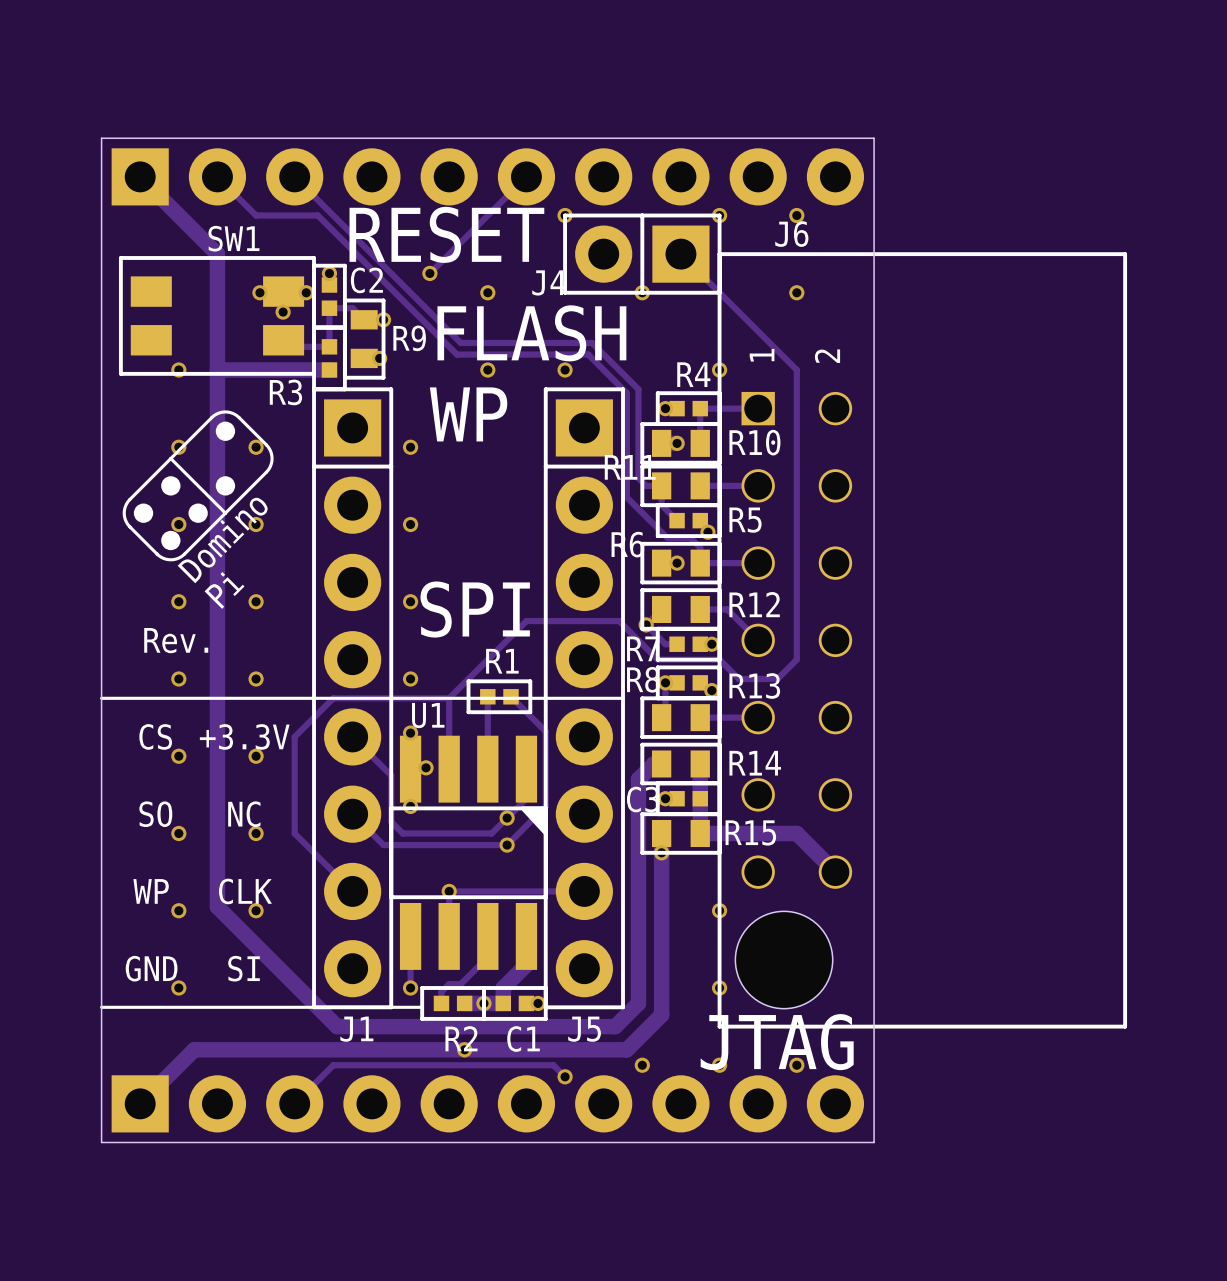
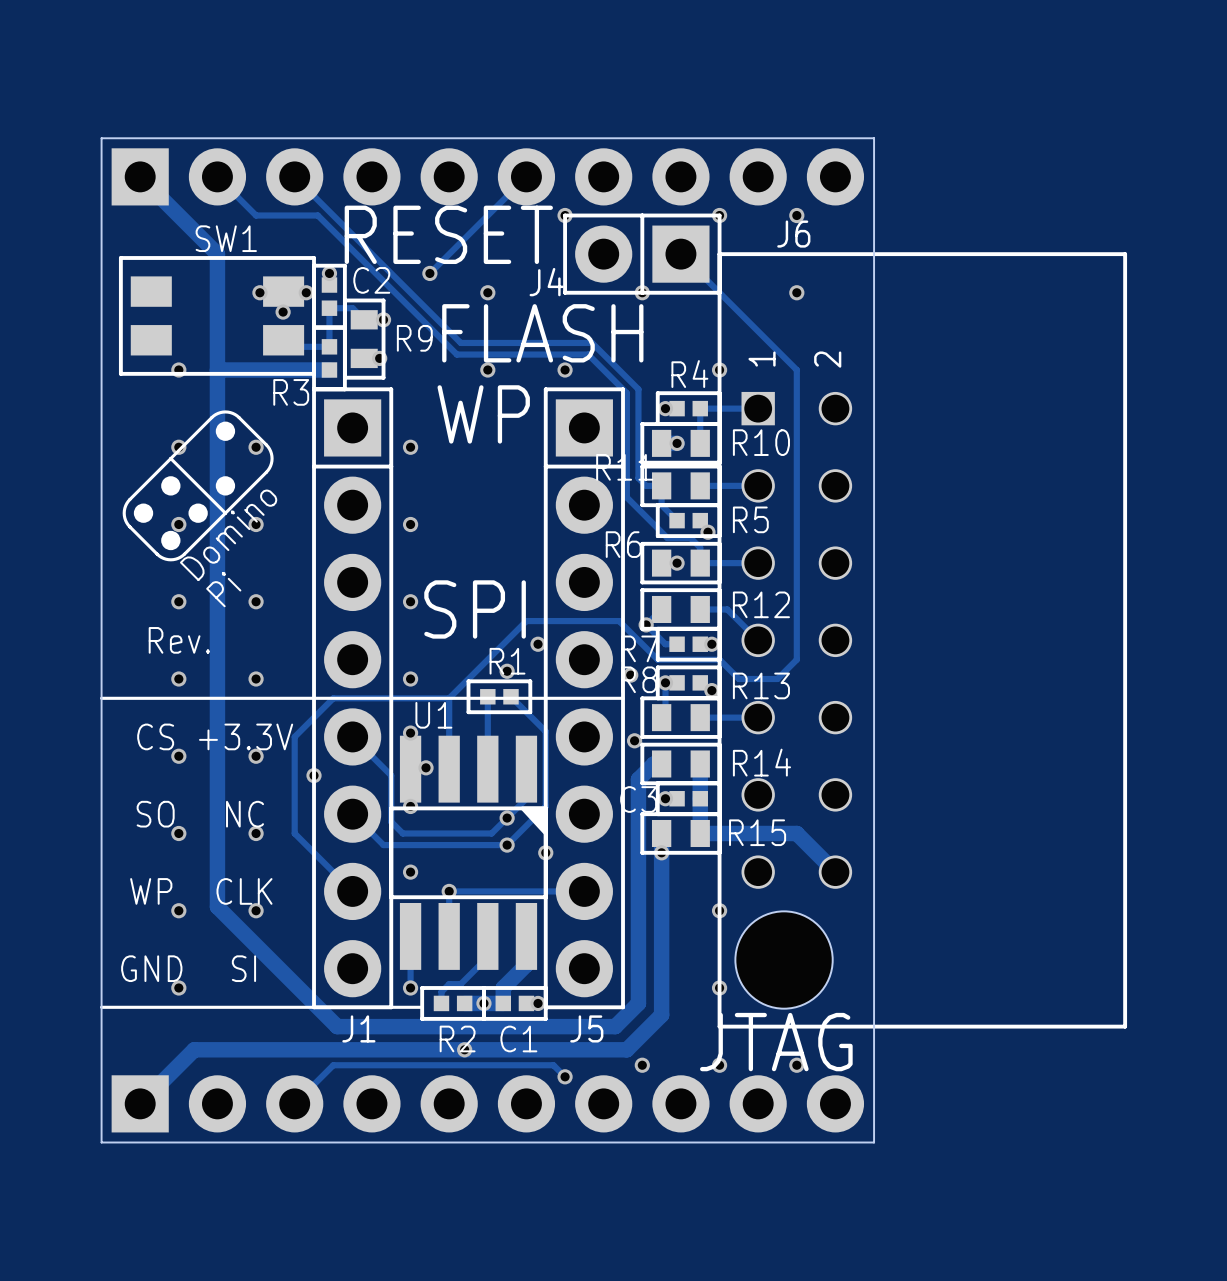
via: none -> (538, 644)
via: none -> (507, 671)
via: none -> (630, 675)
via: none -> (634, 740)
via: none -> (314, 775)
via: none -> (545, 852)
via: none -> (410, 872)

